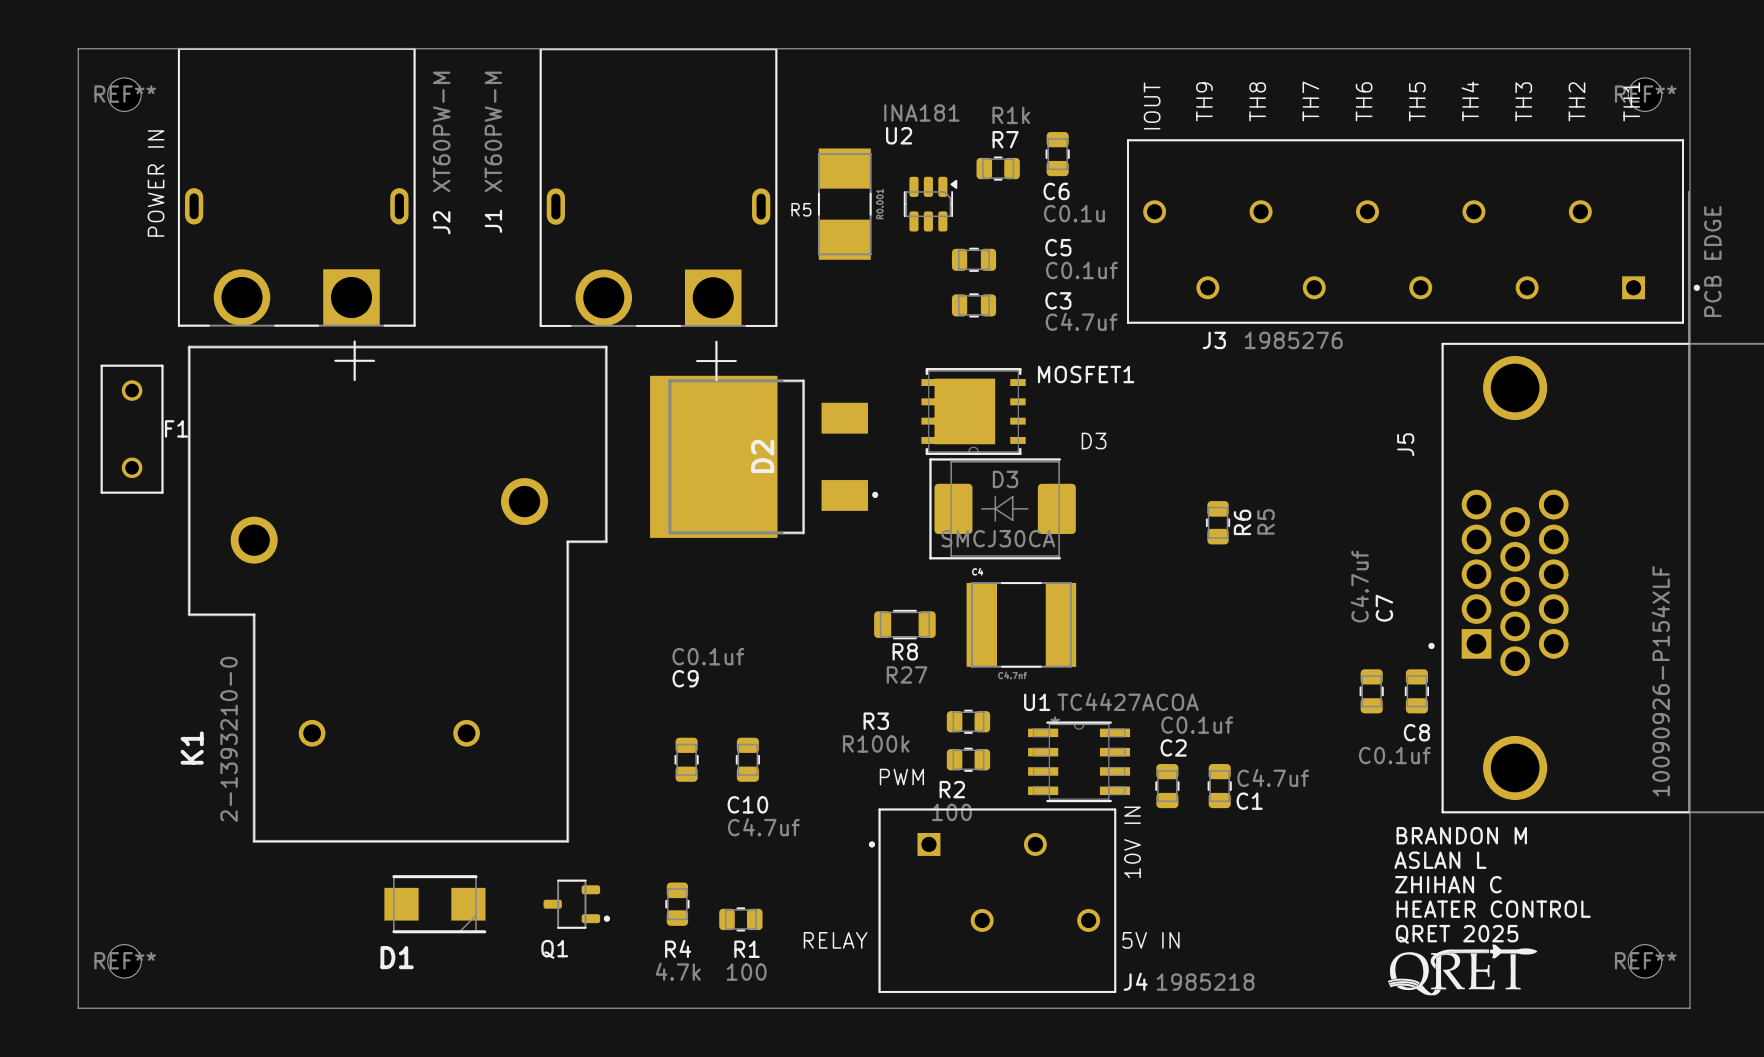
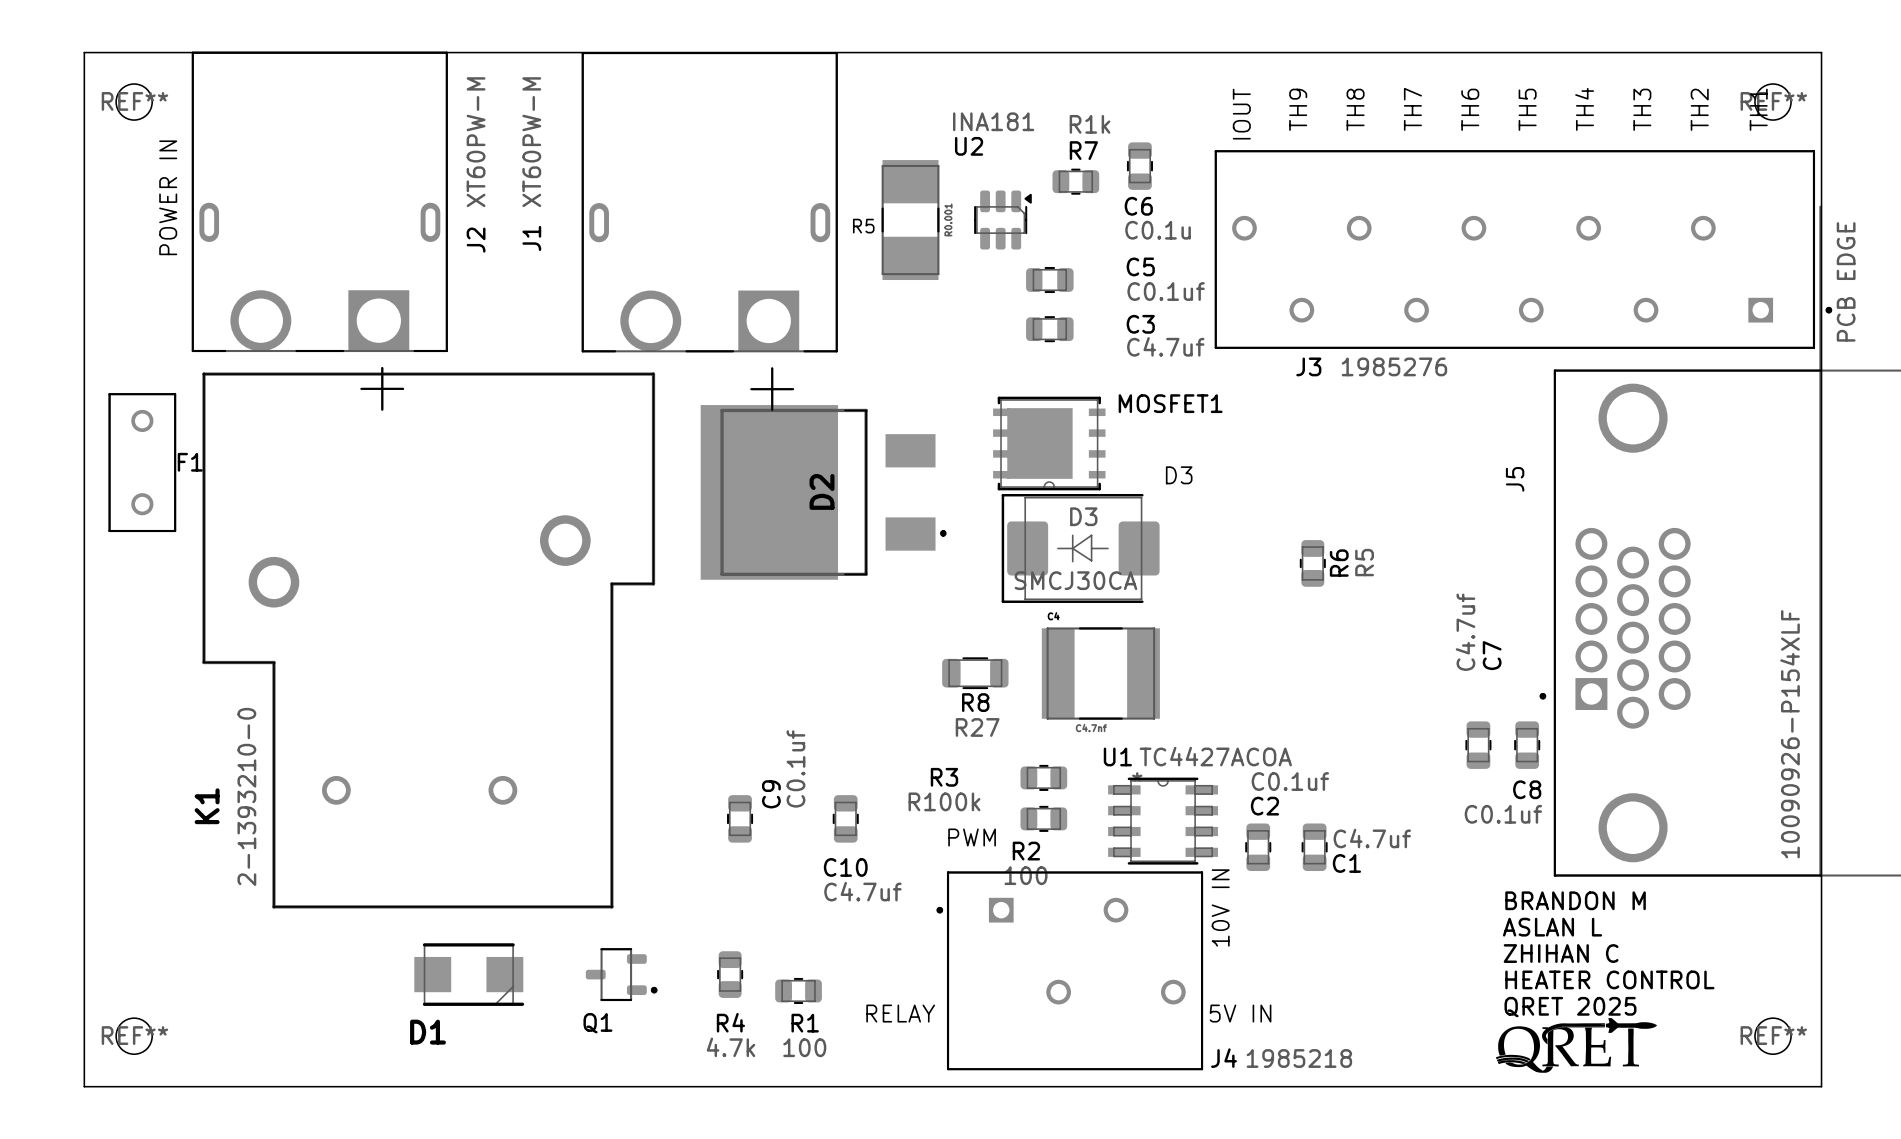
C9 value rotation: 0° (708, 656) -> 90° counterclockwise (795, 768)
C9 name rotation: 0° (685, 678) -> 90° counterclockwise (771, 794)
C9 name position: C9 (685, 678) -> C9 (771, 794)
C10 position: (747, 759) -> (845, 818)

